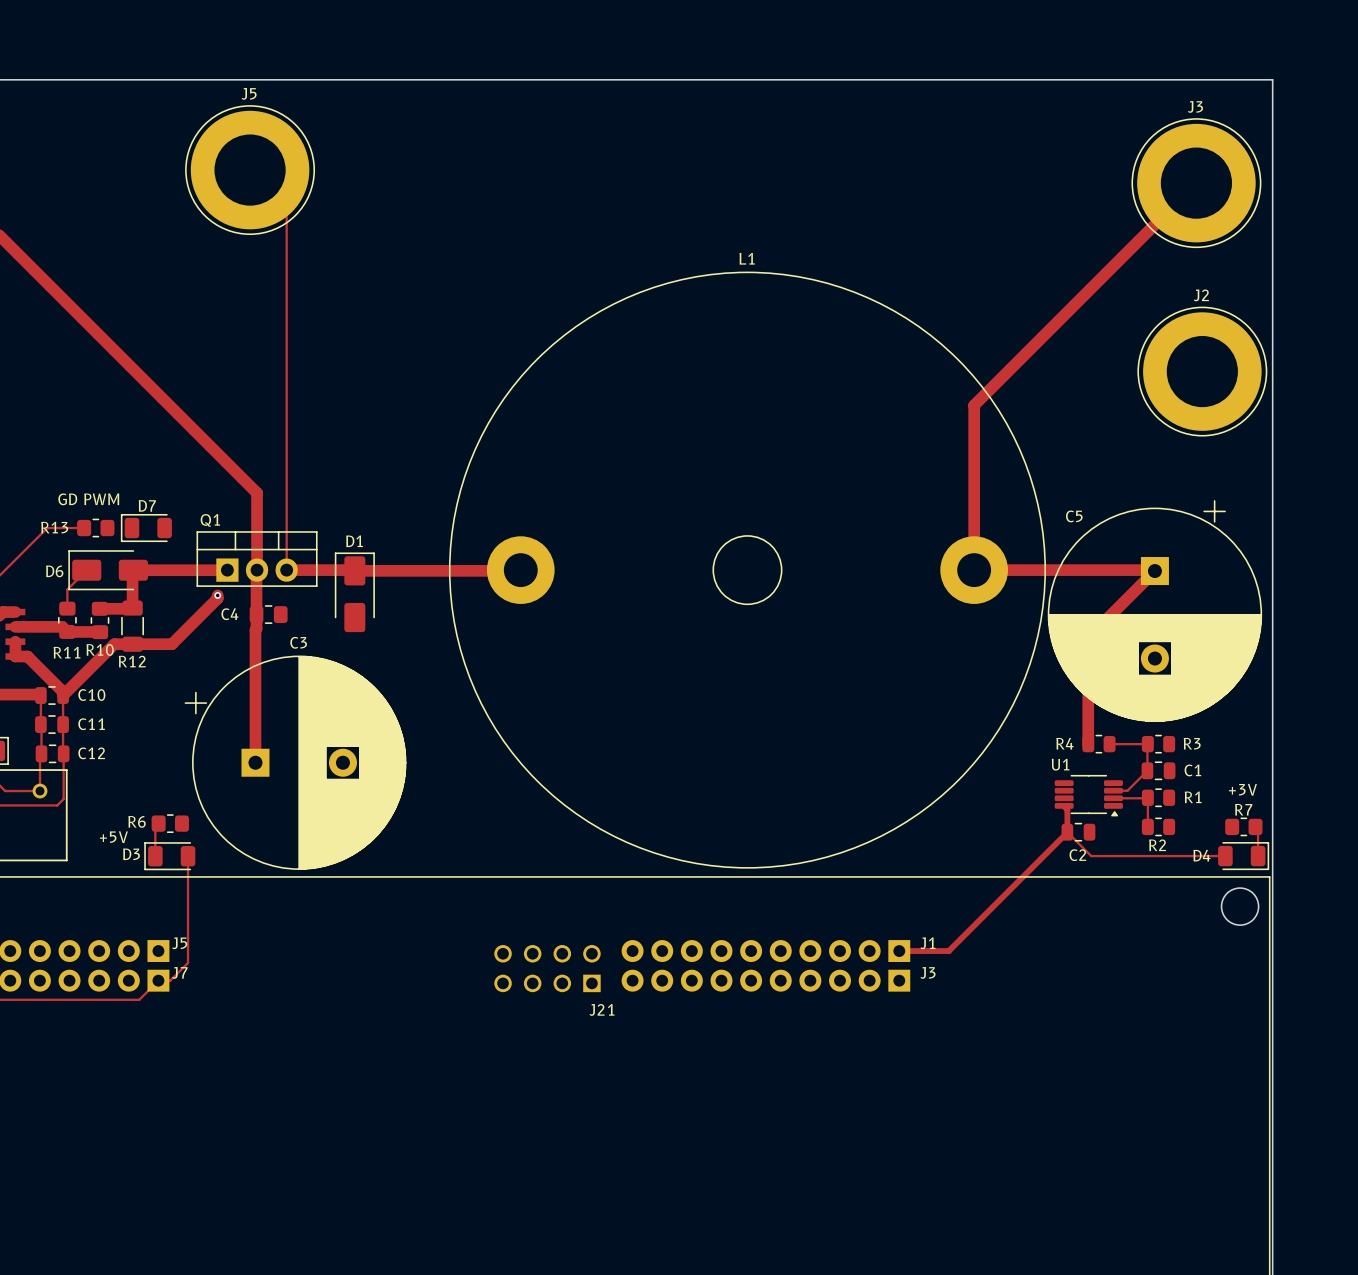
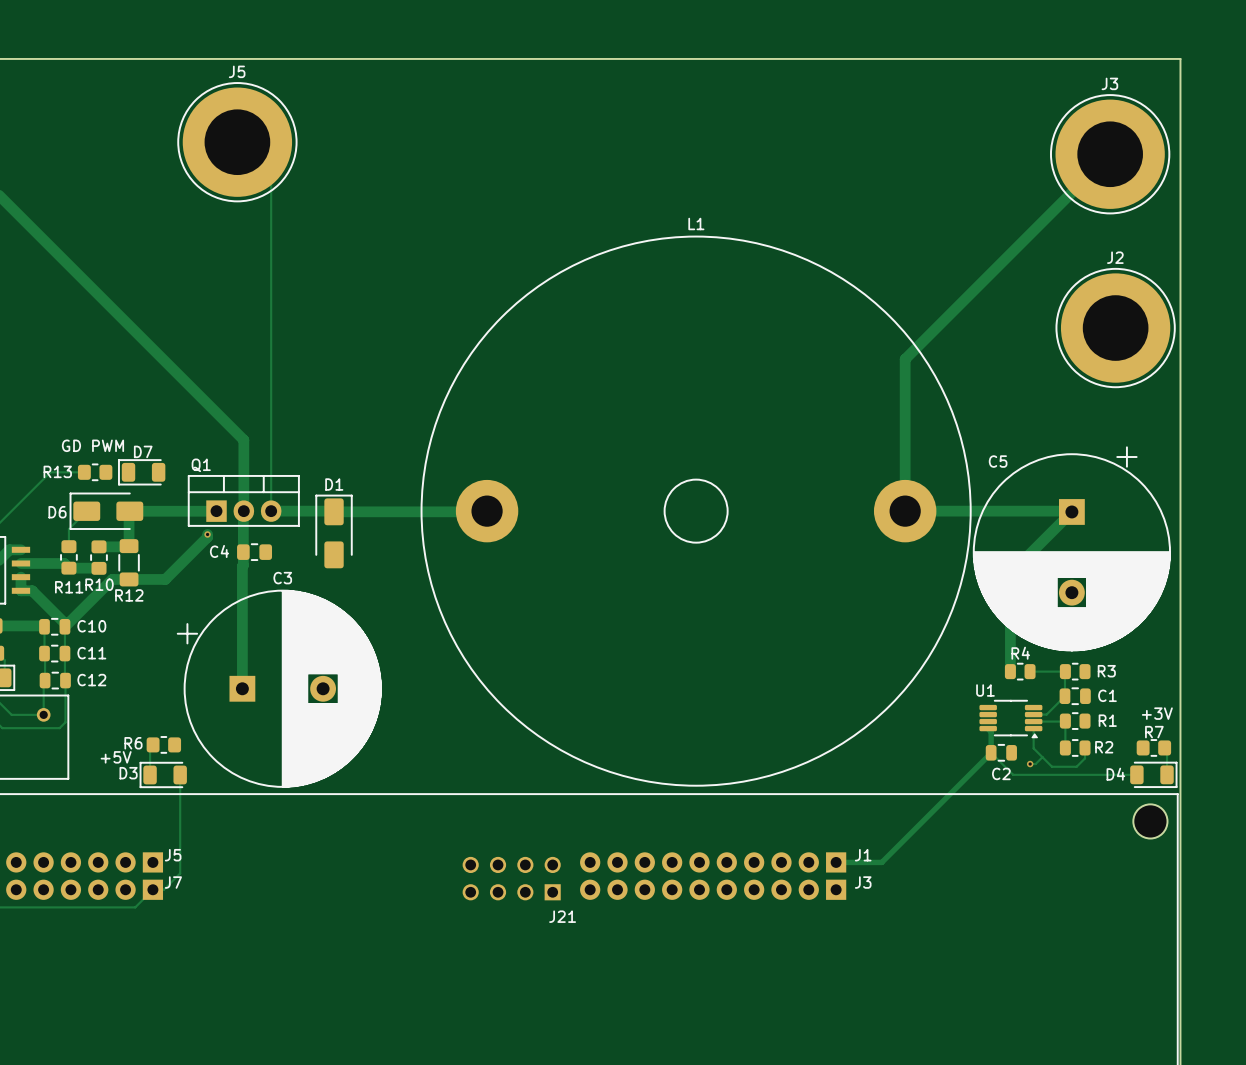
R4 name position: R4 (1064, 743) -> R4 (1020, 653)
track: none -> (1033, 728) (1033, 748) (1052, 766) (1076, 766) (1085, 758) (1085, 747)
track: none -> (1042, 757) (1035, 764) (1030, 764)
via: none -> (1030, 764)
R2 name position: R2 (1157, 845) -> R2 (1104, 747)

